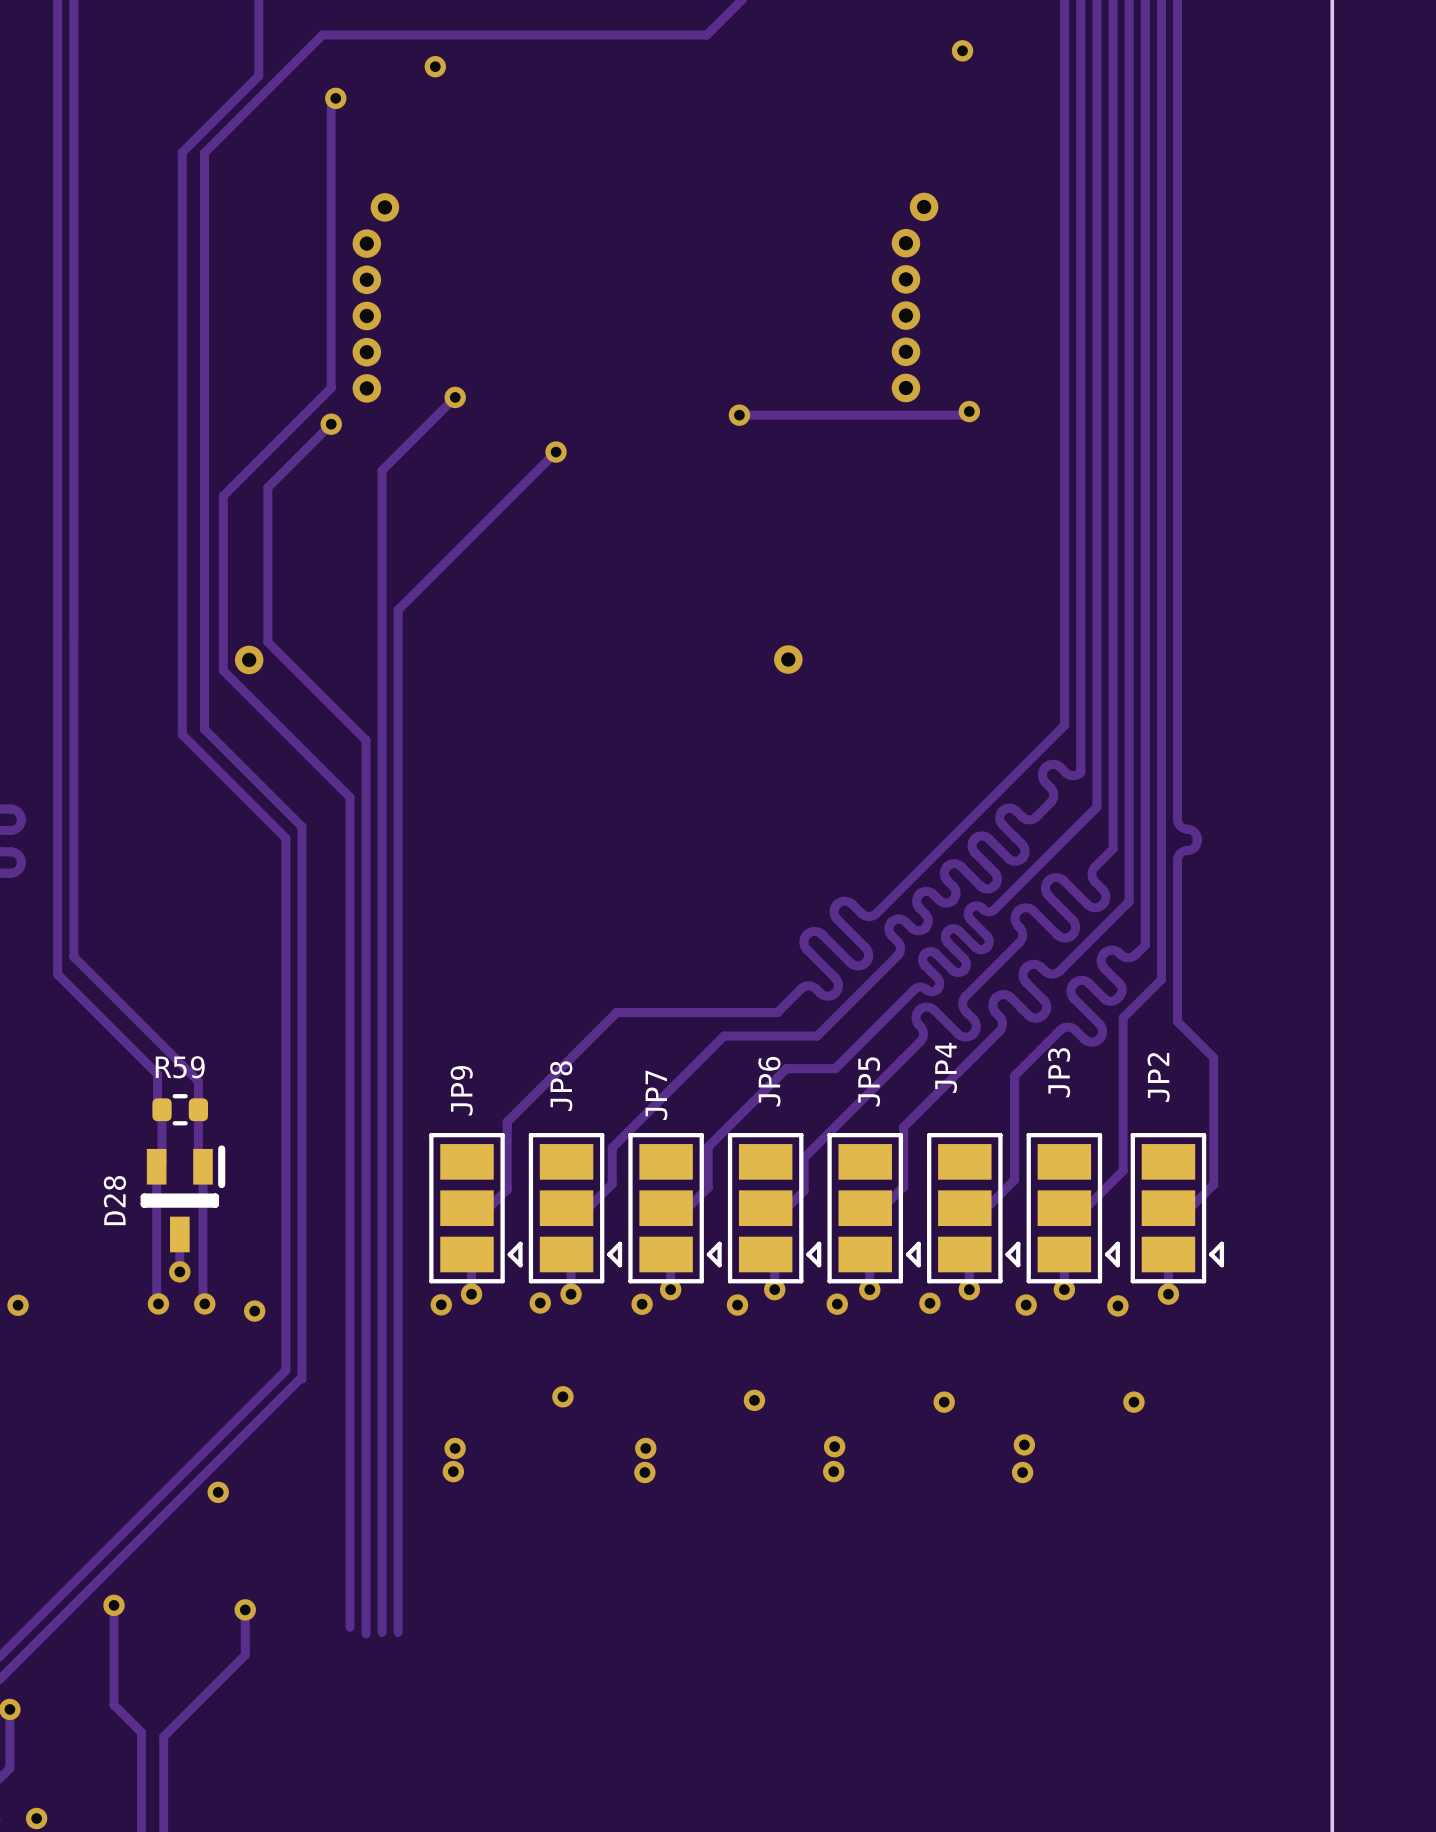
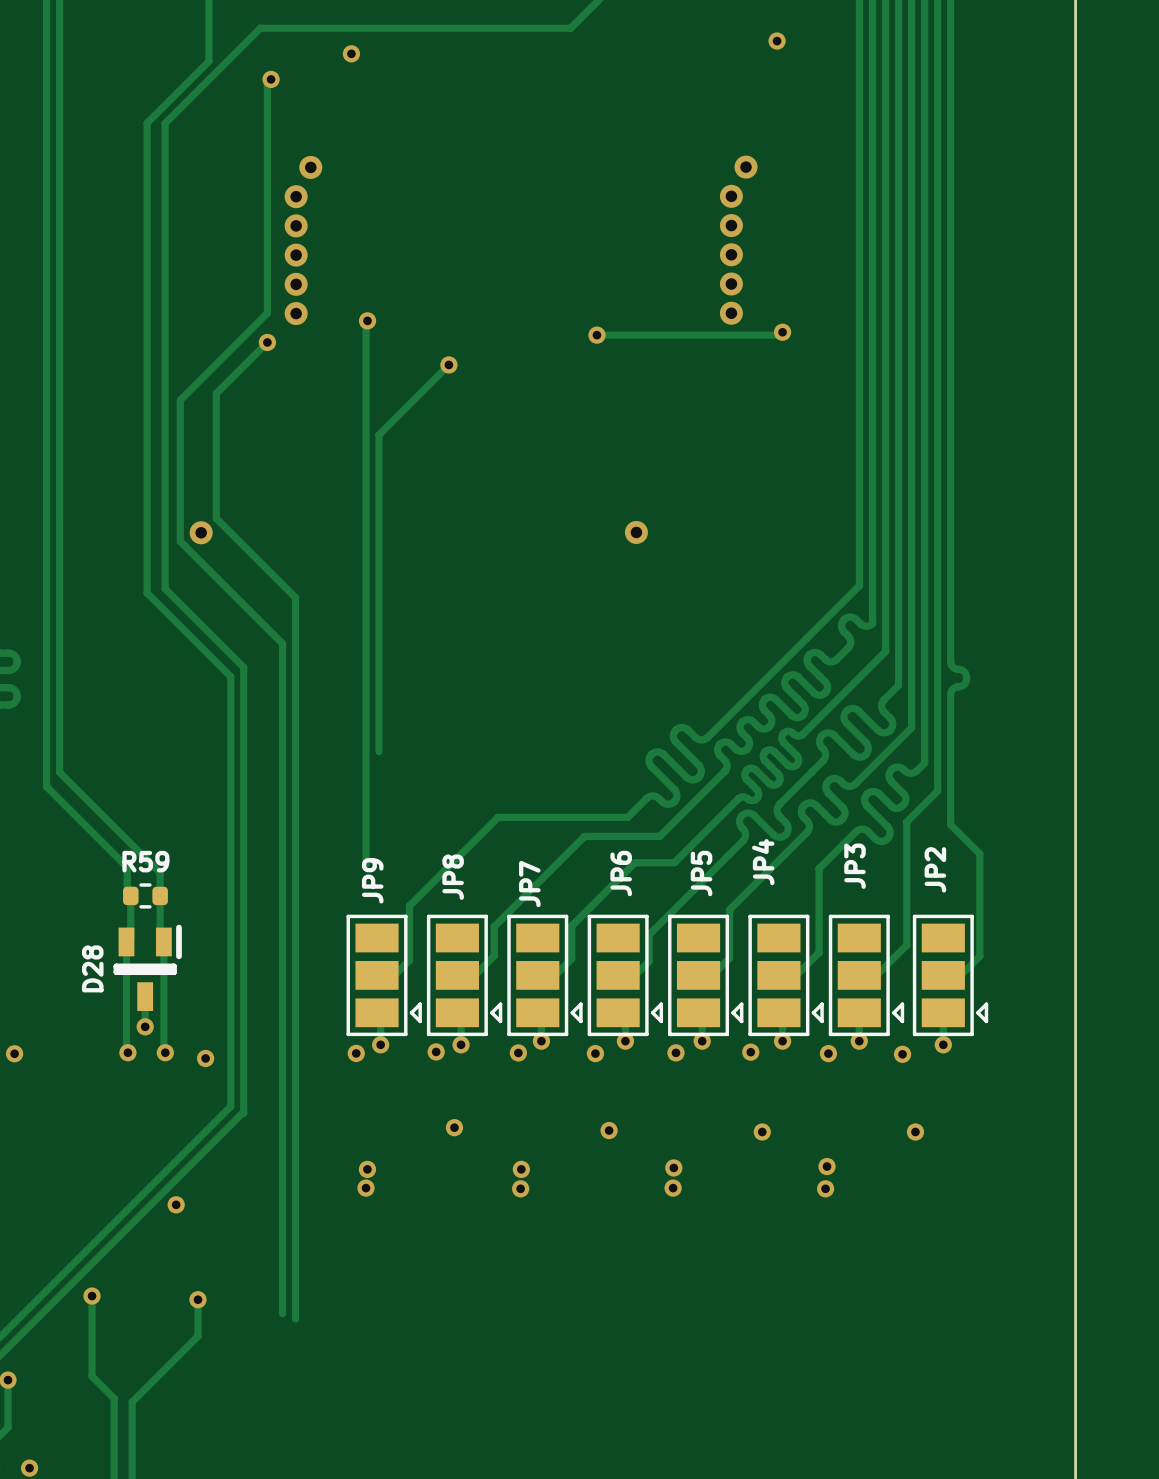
track: (453, 399) (382, 470) (382, 1632) -> (366, 322) (366, 864)
track: (469, 538) (398, 609) (398, 1632) -> (379, 434) (379, 751)

